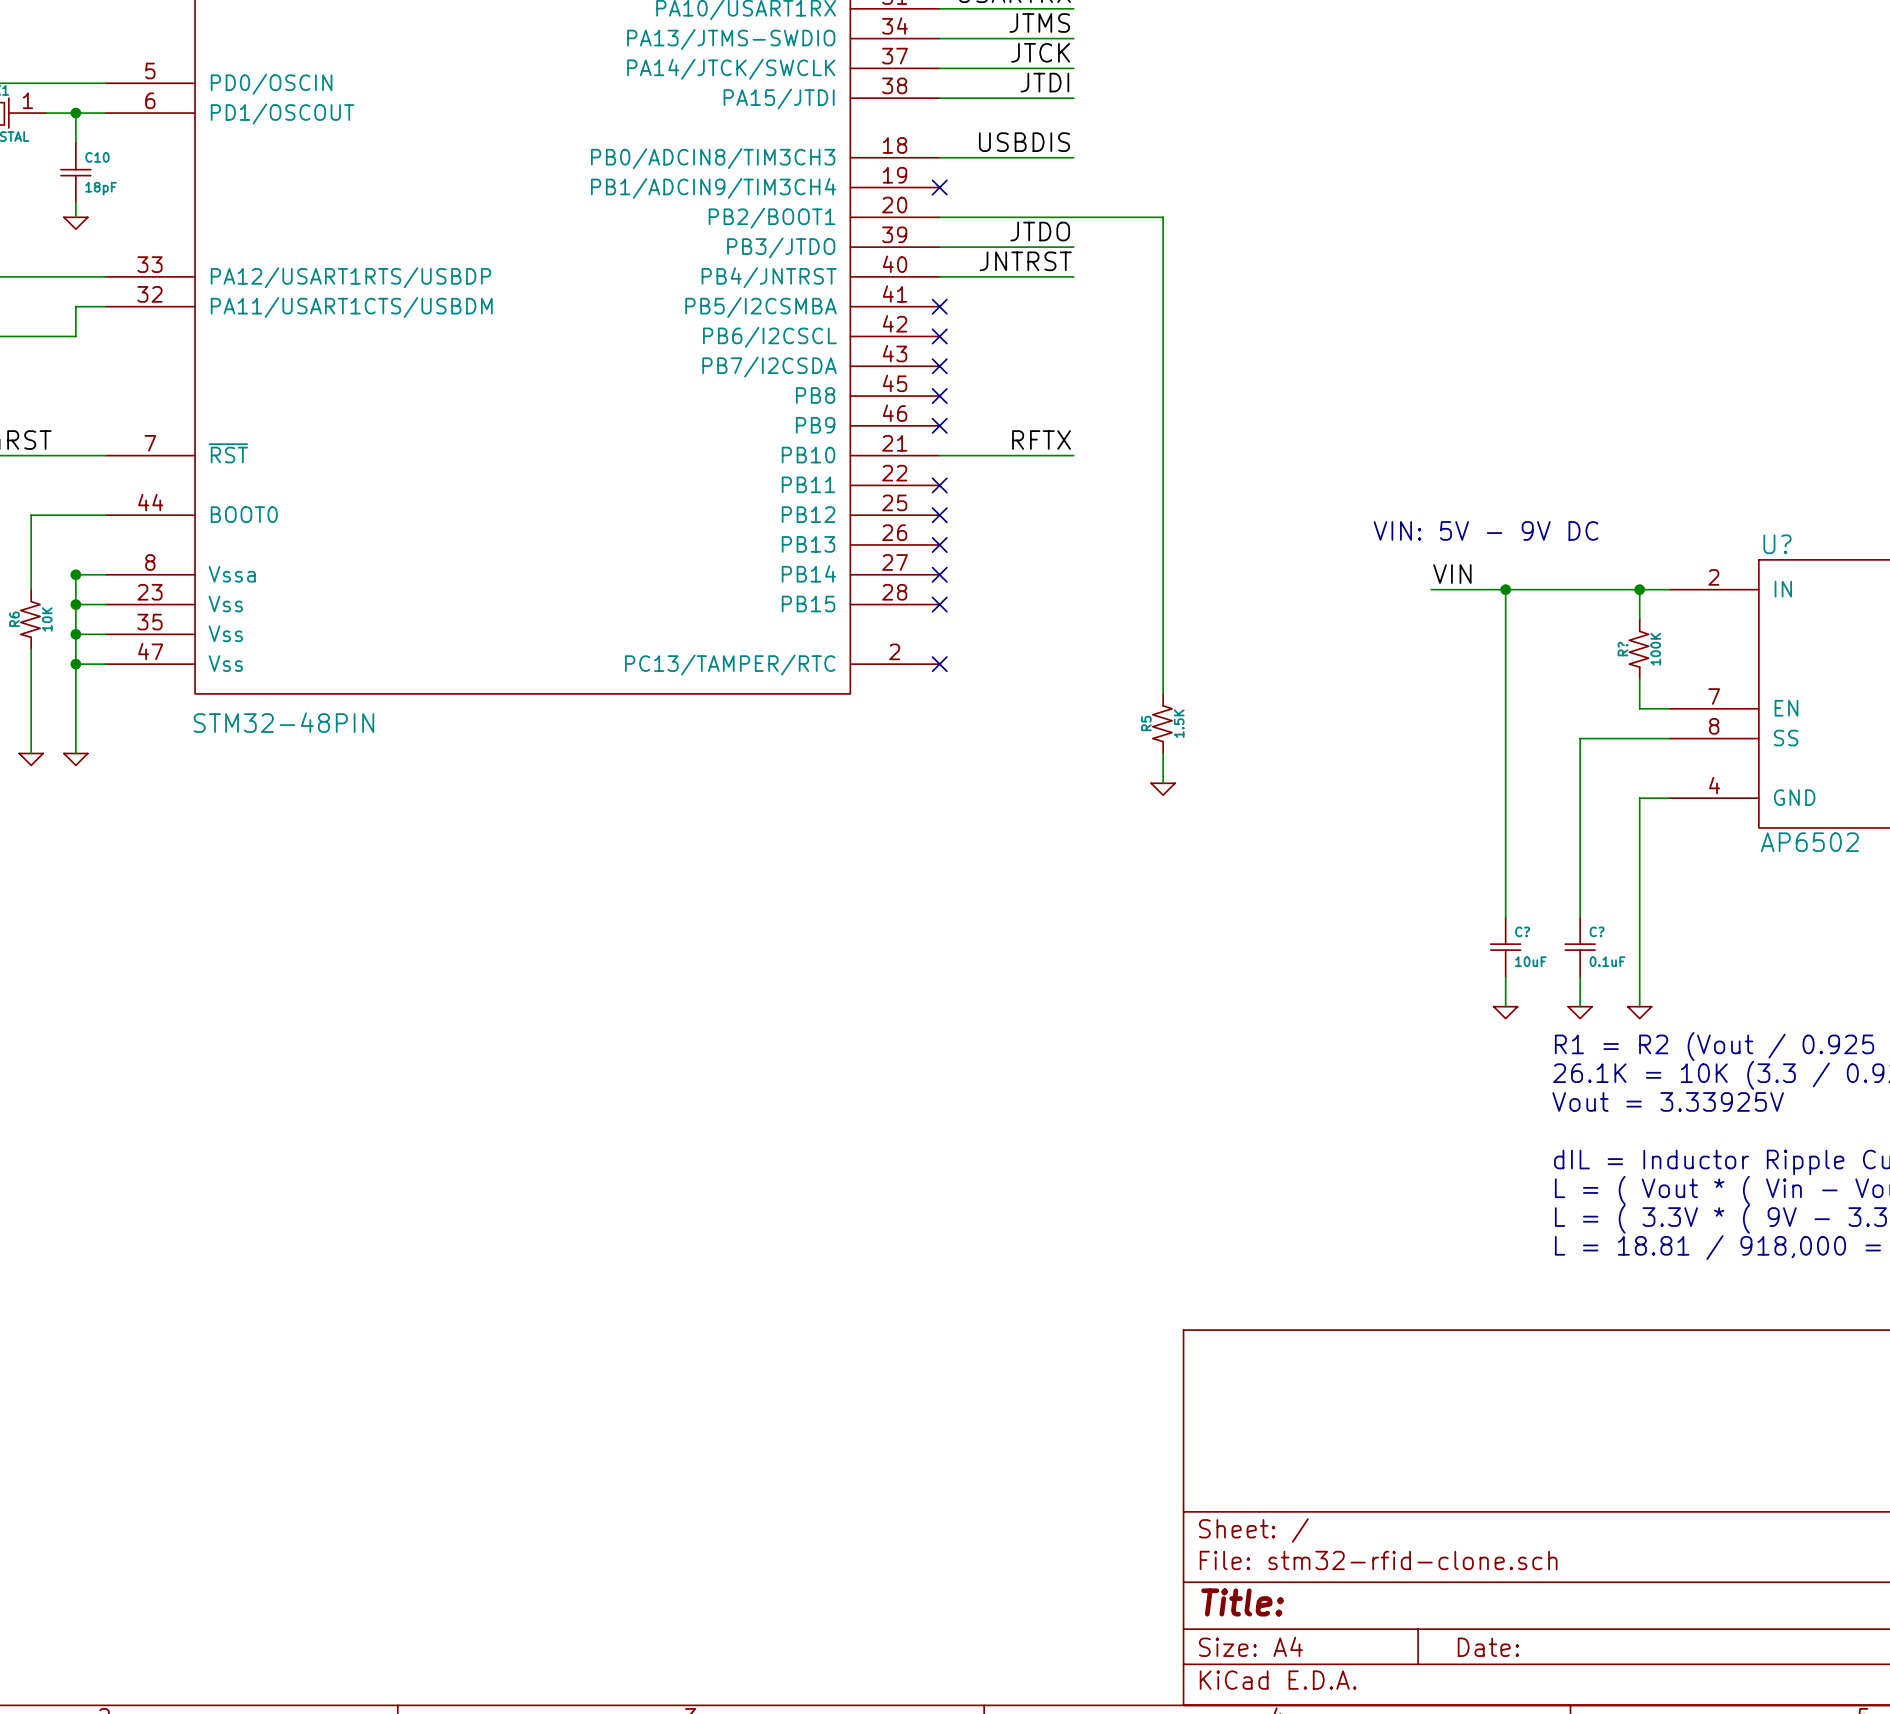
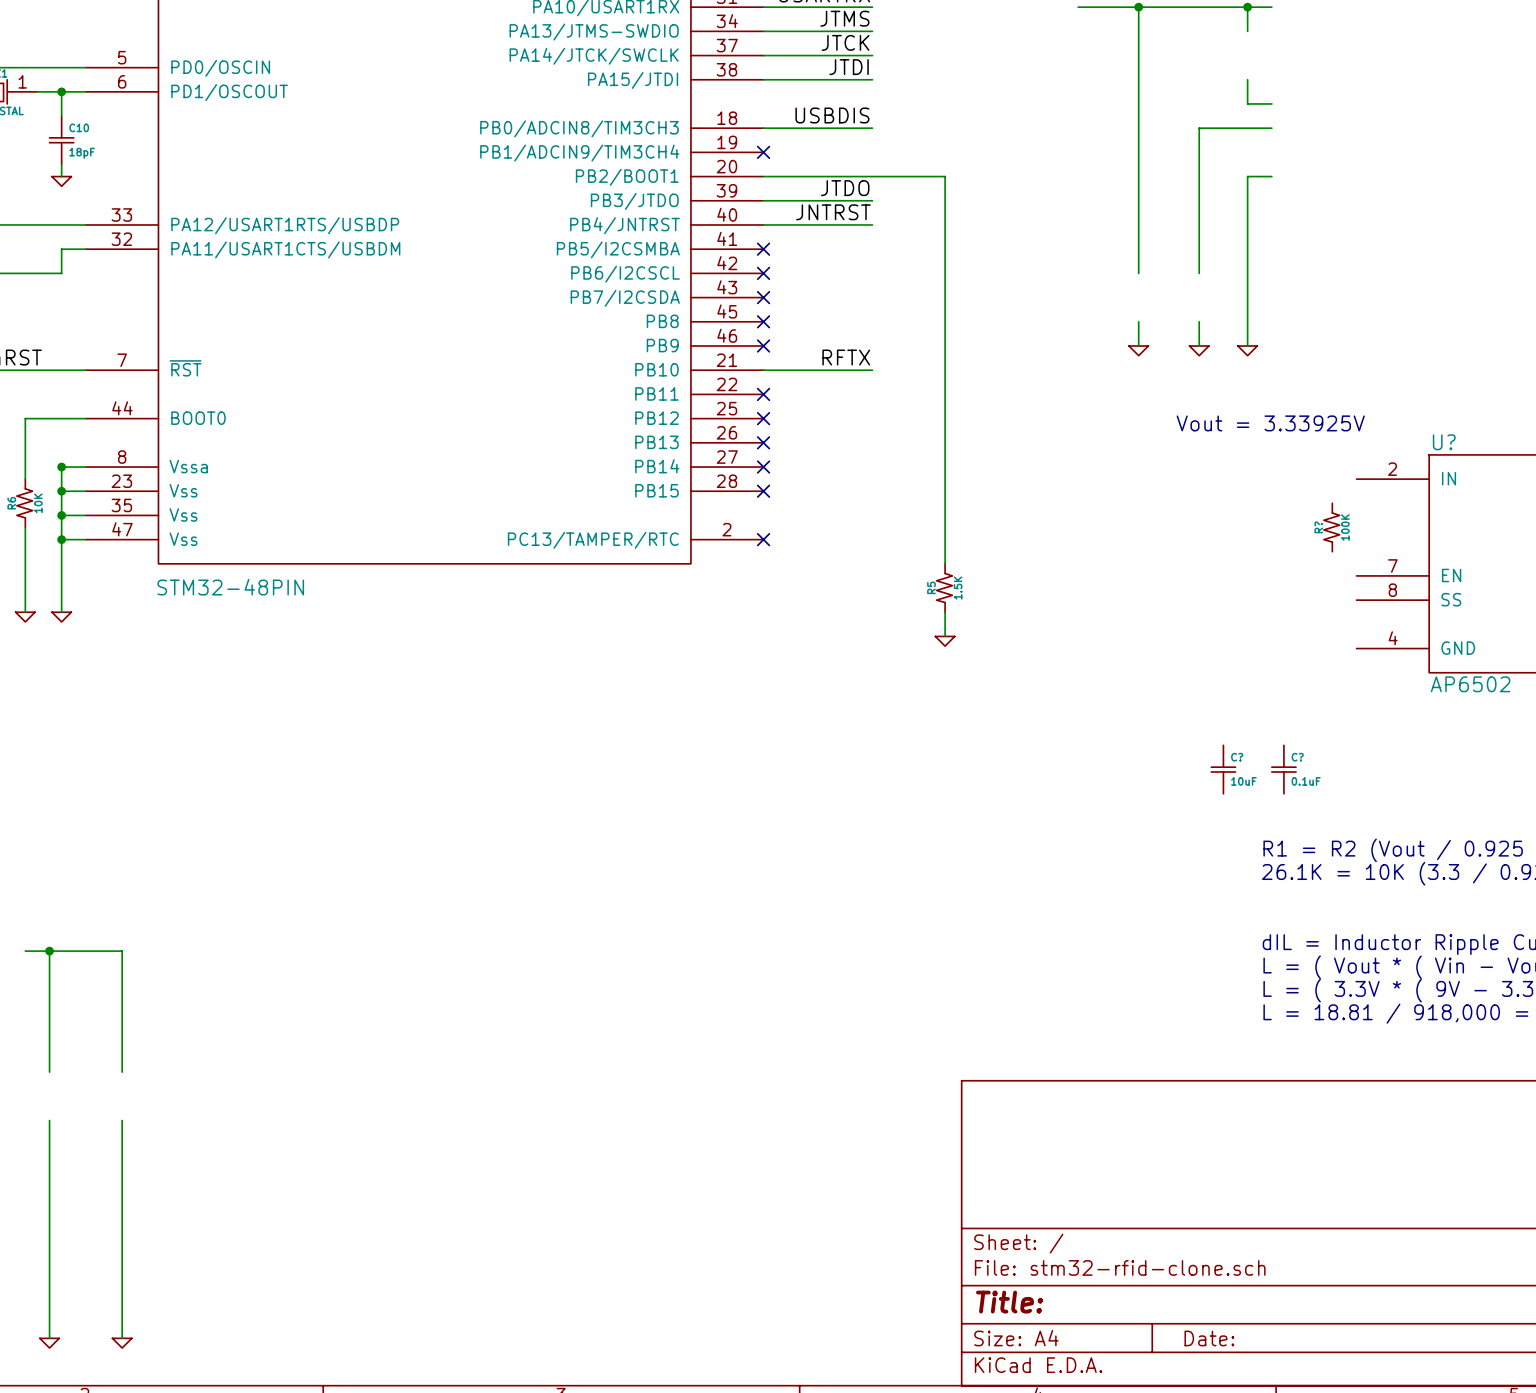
wire: none -> (1078, 7) (1271, 7)
wire: none -> (1138, 7) (1138, 273)
junction: none -> (1138, 7)
wire: none -> (1247, 7) (1247, 31)
junction: none -> (1247, 7)
wire: none -> (1247, 79) (1247, 103) (1271, 103)
wire: none -> (1271, 128) (1199, 128) (1199, 273)
wire: none -> (1271, 176) (1247, 176) (1247, 346)
wire: none -> (1138, 321) (1138, 346)
power symbol: none -> (1138, 350)
power symbol: none -> (1199, 350)
power symbol: none -> (1247, 350)
text: none -> Vout = 3.33925V (1270, 423)
text: VIN: 5V - 9V DC (1486, 530) -> none
label: VIN (1452, 574) -> none
wire: (1431, 589) (1669, 589) -> none
wire: (1505, 589) (1505, 917) -> none
junction: (1505, 589) -> none
wire: (1639, 589) (1639, 619) -> (1199, 321) (1199, 346)
junction: (1639, 589) -> none
wire: (1639, 679) (1639, 708) (1669, 708) -> none
wire: (1669, 738) (1580, 738) (1580, 917) -> none
wire: (1669, 798) (1639, 798) (1639, 1006) -> none
wire: (1505, 976) (1505, 1006) -> none
wire: (1580, 976) (1580, 1006) -> none
power symbol: (1505, 1012) -> none
power symbol: (1580, 1012) -> none
power symbol: (1639, 1012) -> none
text: Vout = 3.33925V (1668, 1101) -> none
wire: none -> (25, 951) (122, 951) (122, 1072)
wire: none -> (49, 951) (49, 1072)
junction: none -> (49, 951)
wire: none -> (49, 1120) (49, 1338)
wire: none -> (122, 1120) (122, 1338)
power symbol: none -> (49, 1343)
power symbol: none -> (122, 1343)

